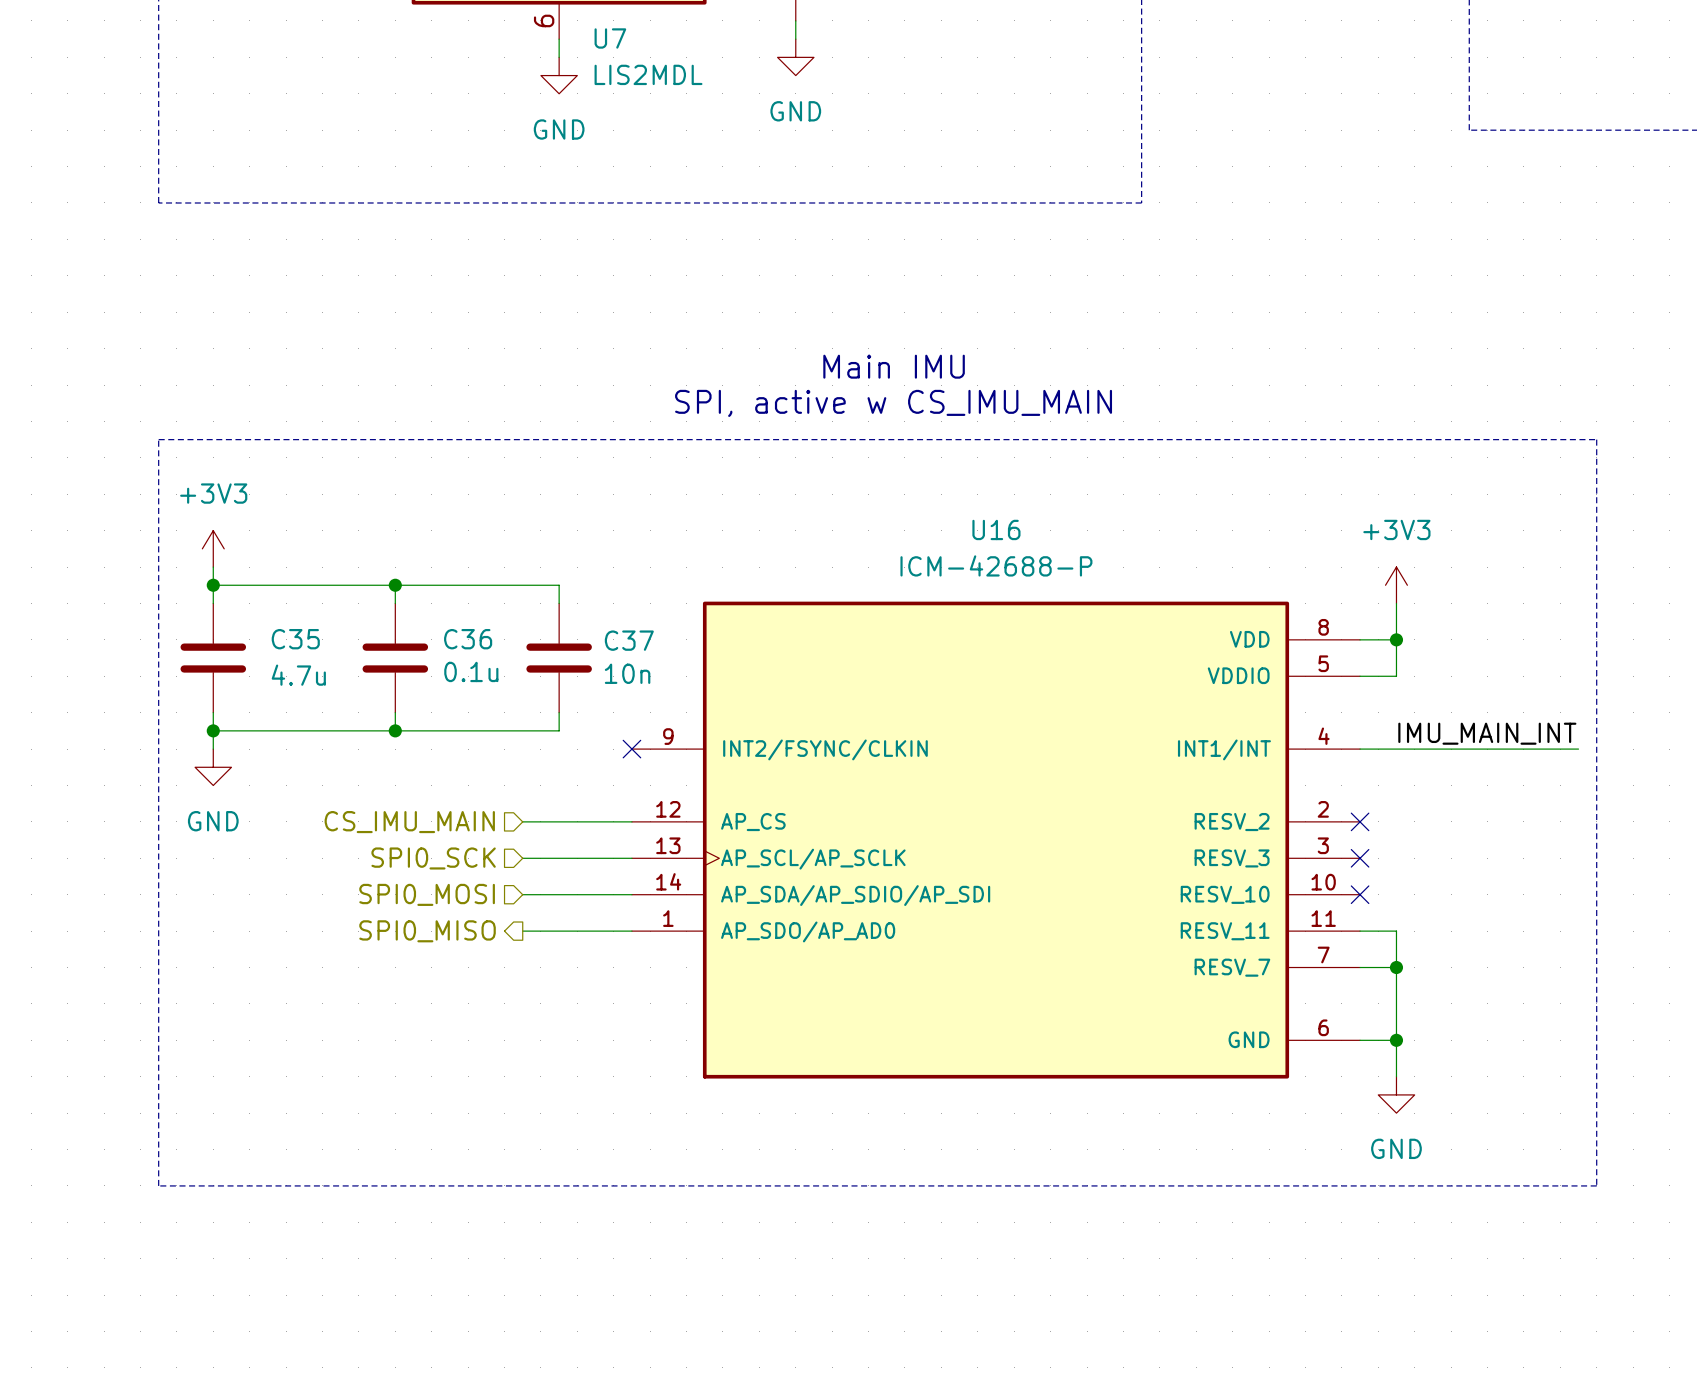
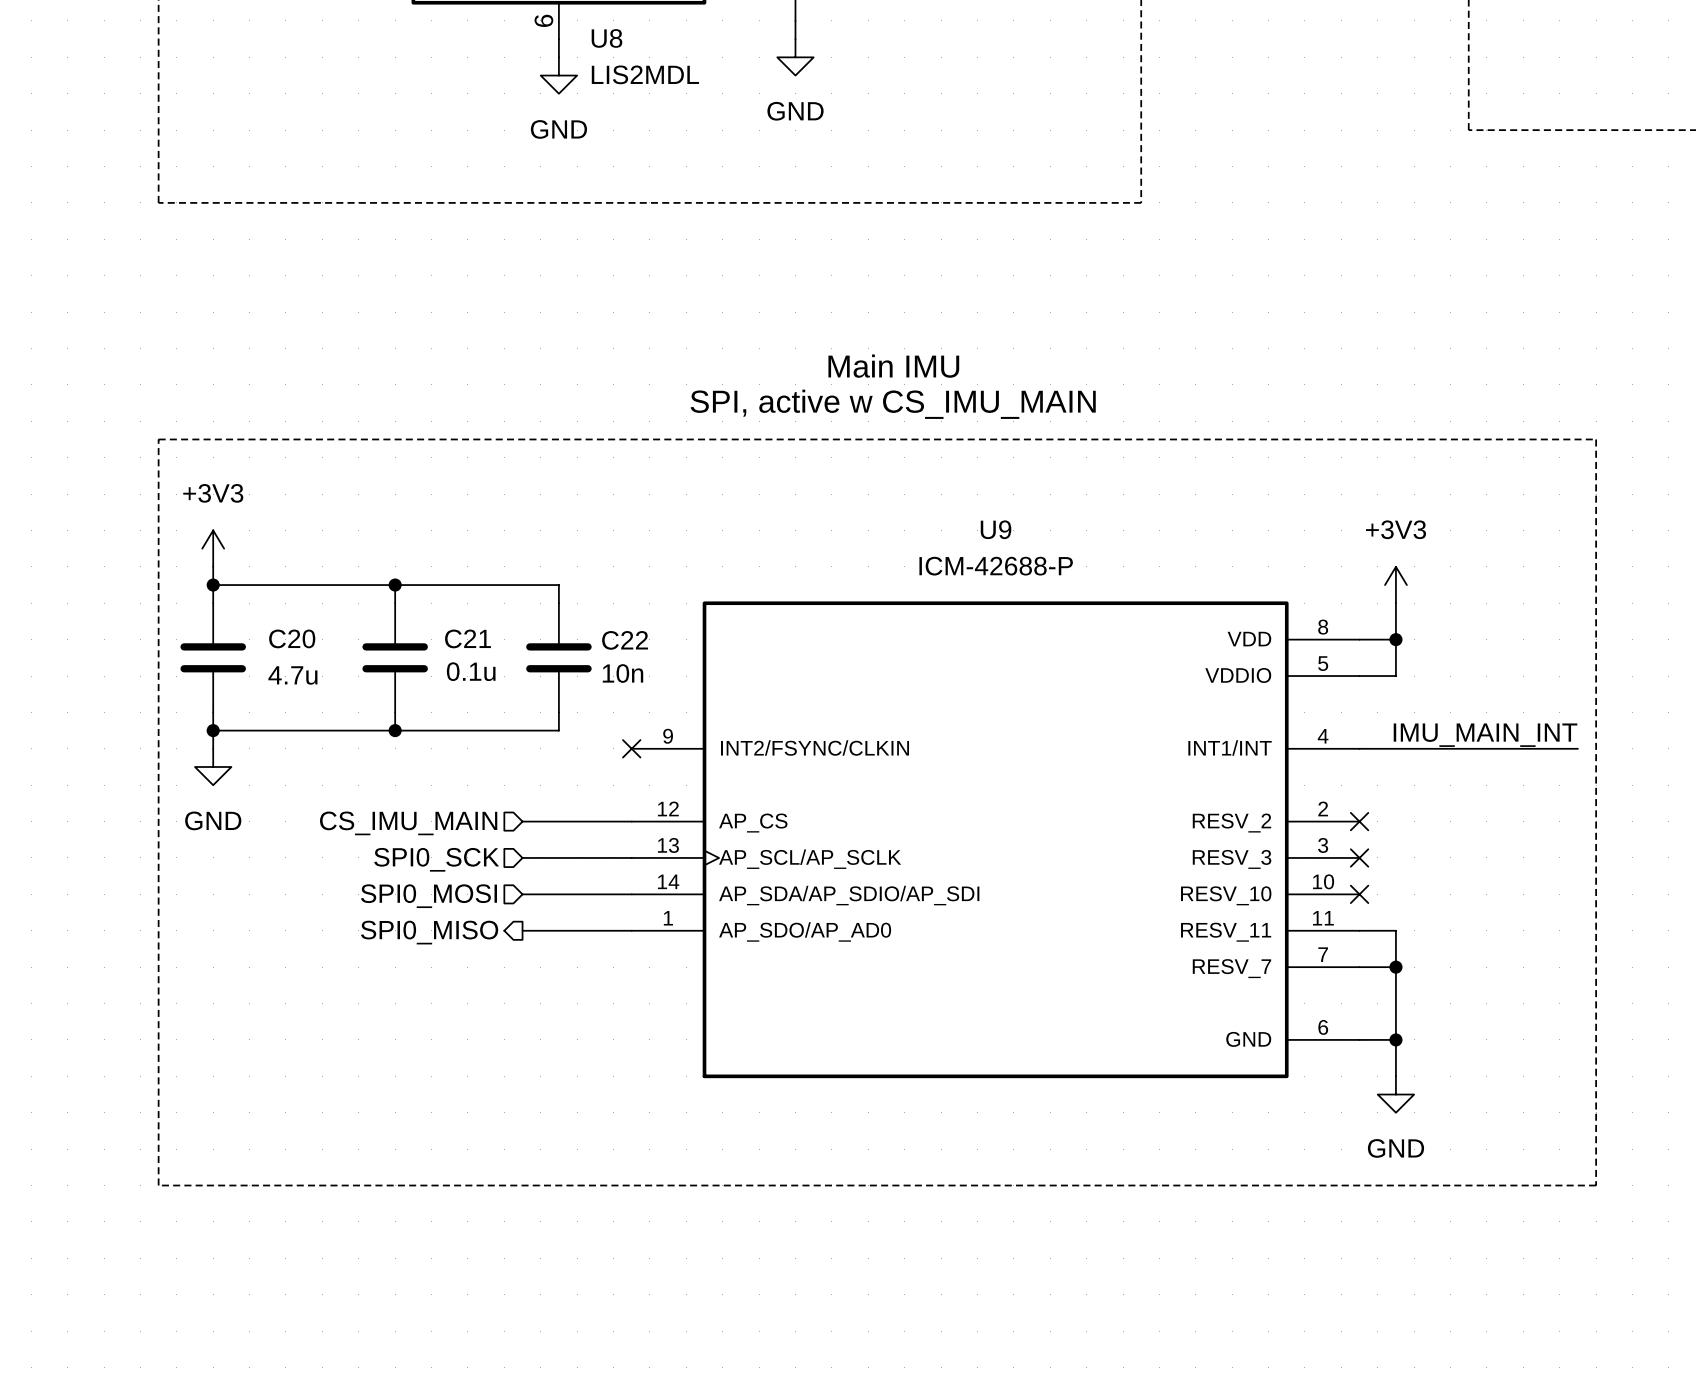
U7 name: U7 (610, 38) -> U8 (606, 38)
U16 name: U16 (996, 529) -> U9 (996, 529)
C35 name: C35 (295, 639) -> C20 (292, 638)
C36 name: C36 (468, 639) -> C21 (467, 638)
C37 name: C37 (629, 640) -> C22 (625, 640)

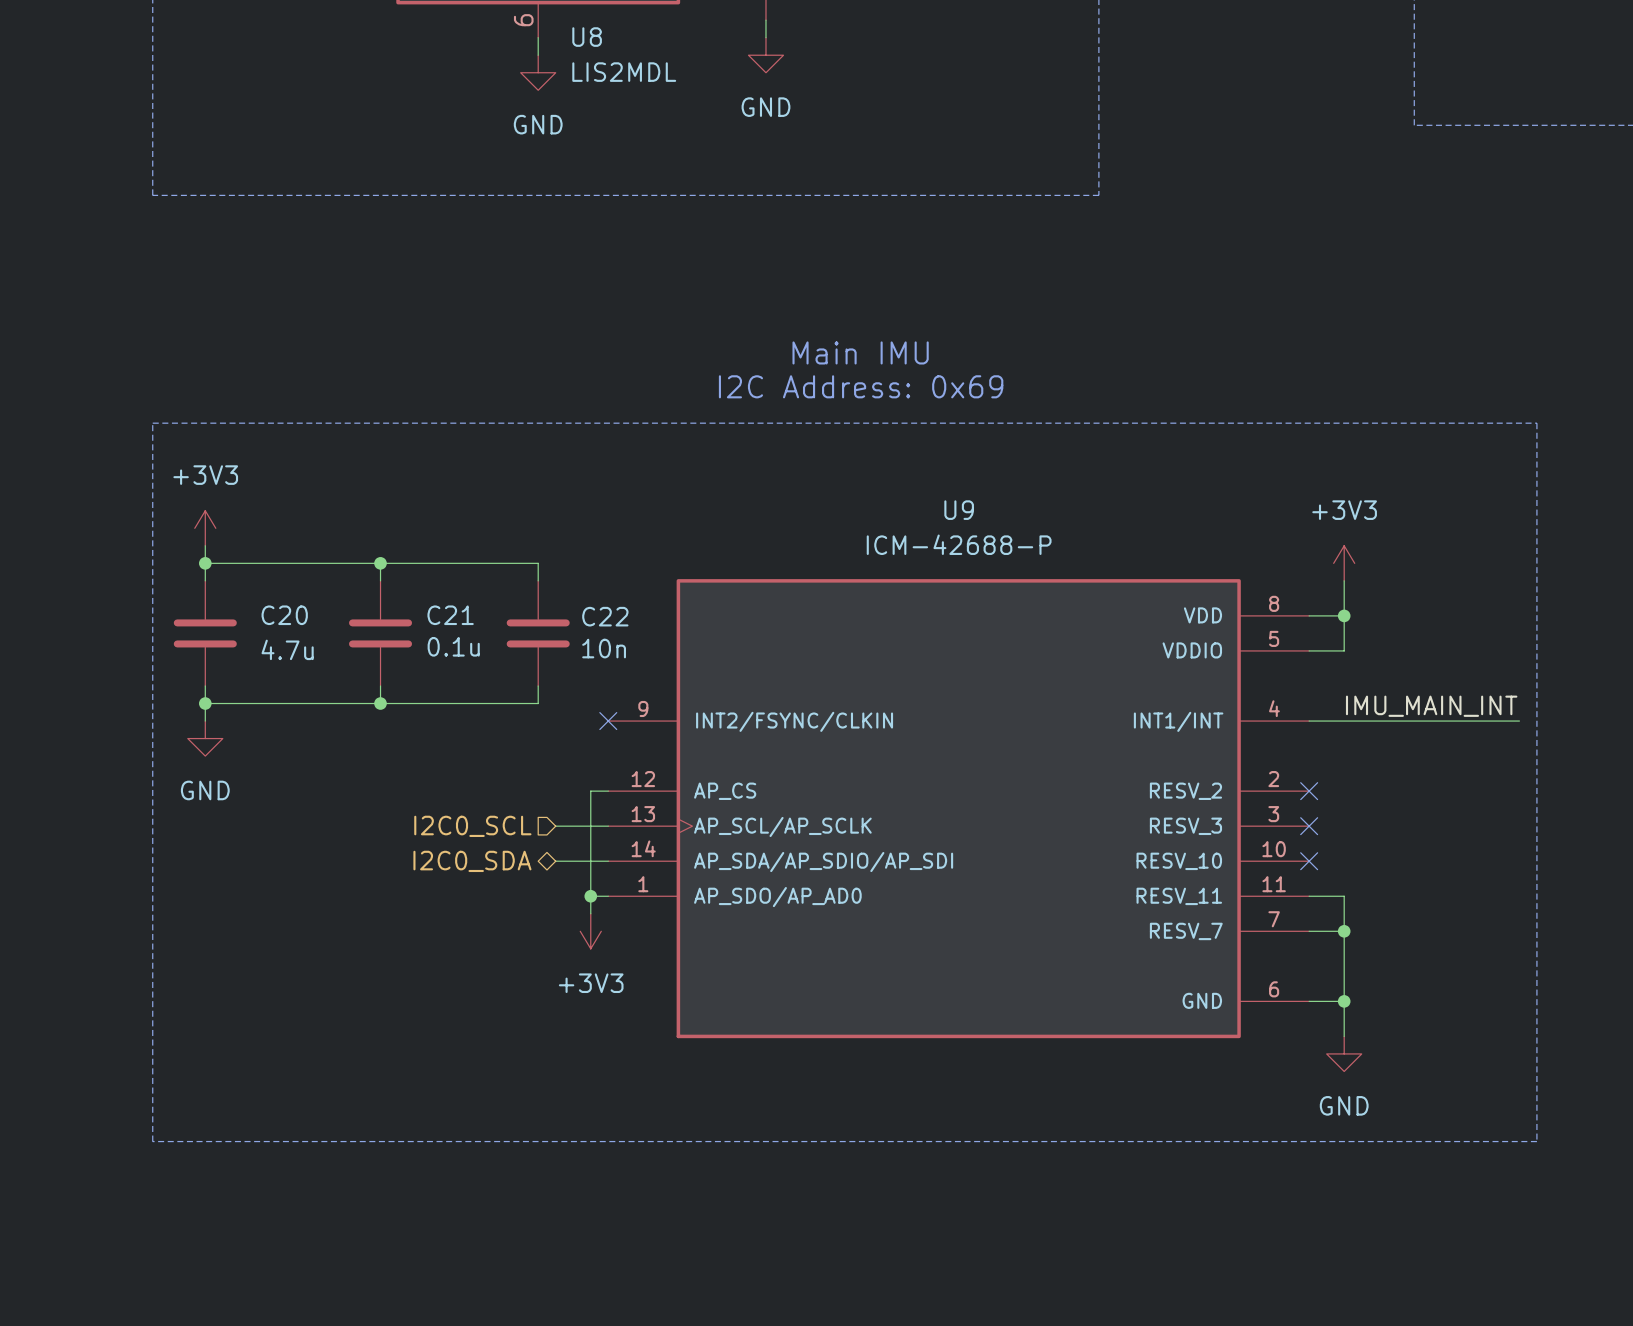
text: SPI, active w CS_IMU_MAIN (893, 404) -> I2C Address: 0x69 (861, 386)
wire: (522, 821) (613, 821) -> (590, 913) (590, 791)
hierarchical label: CS_IMU_MAIN (408, 823) -> none
wire: (522, 857) (577, 857) -> none
hierarchical label: SPI0_SCK (436, 859) -> I2C0_SCL (472, 826)
wire: (522, 894) (577, 894) -> none
hierarchical label: SPI0_MOSI (428, 896) -> none
hierarchical label: none -> I2C0_SDA (472, 861)
wire: (522, 930) (613, 930) -> none
junction: none -> (590, 896)
hierarchical label: SPI0_MISO (429, 932) -> none
power symbol: none -> +3V3 (590, 931)

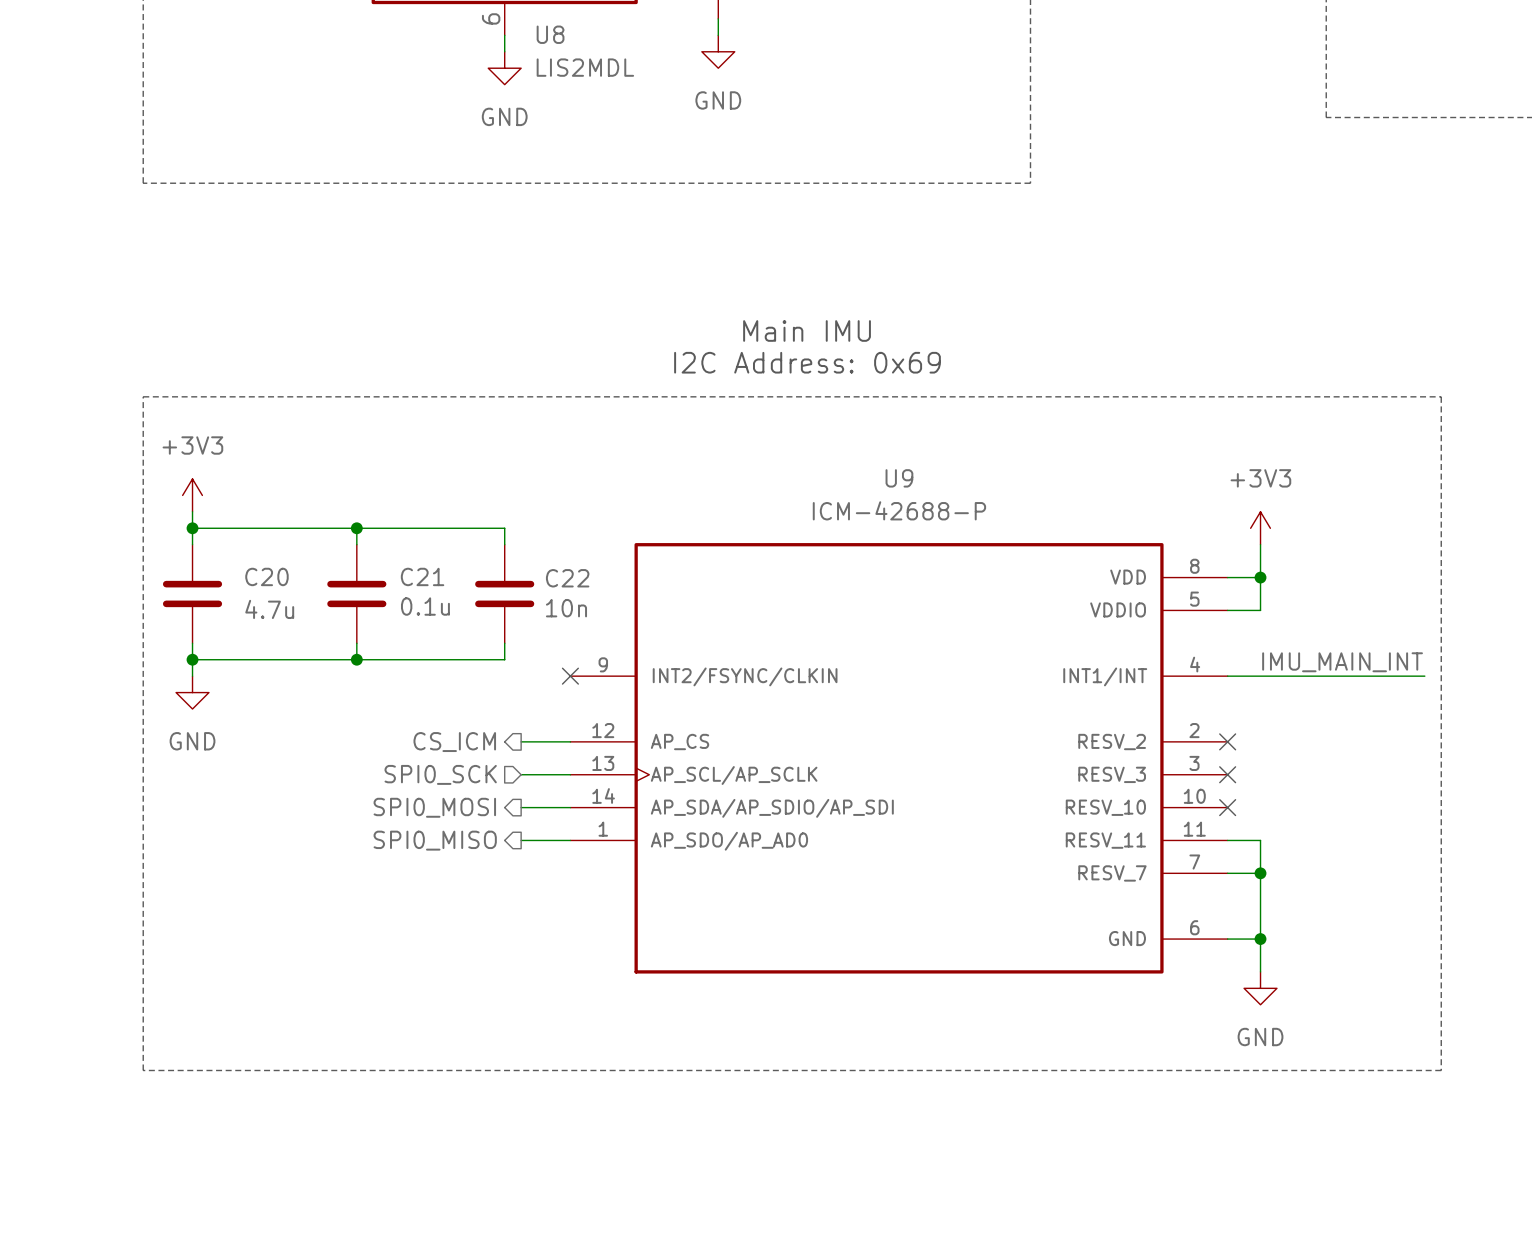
hierarchical label: none -> CS_ICM (454, 742)
wire: (590, 791) (590, 913) -> (553, 741) (521, 741)
hierarchical label: I2C0_SCL (472, 826) -> SPI0_SCK (440, 774)
hierarchical label shape: bidirectional (472, 861) -> output (434, 807)
hierarchical label: I2C0_SDA (472, 861) -> SPI0_MOSI (434, 807)
hierarchical label: none -> SPI0_MISO (435, 840)
wire: none -> (521, 840) (553, 840)
junction: (590, 896) -> none
power symbol: +3V3 (590, 931) -> none

